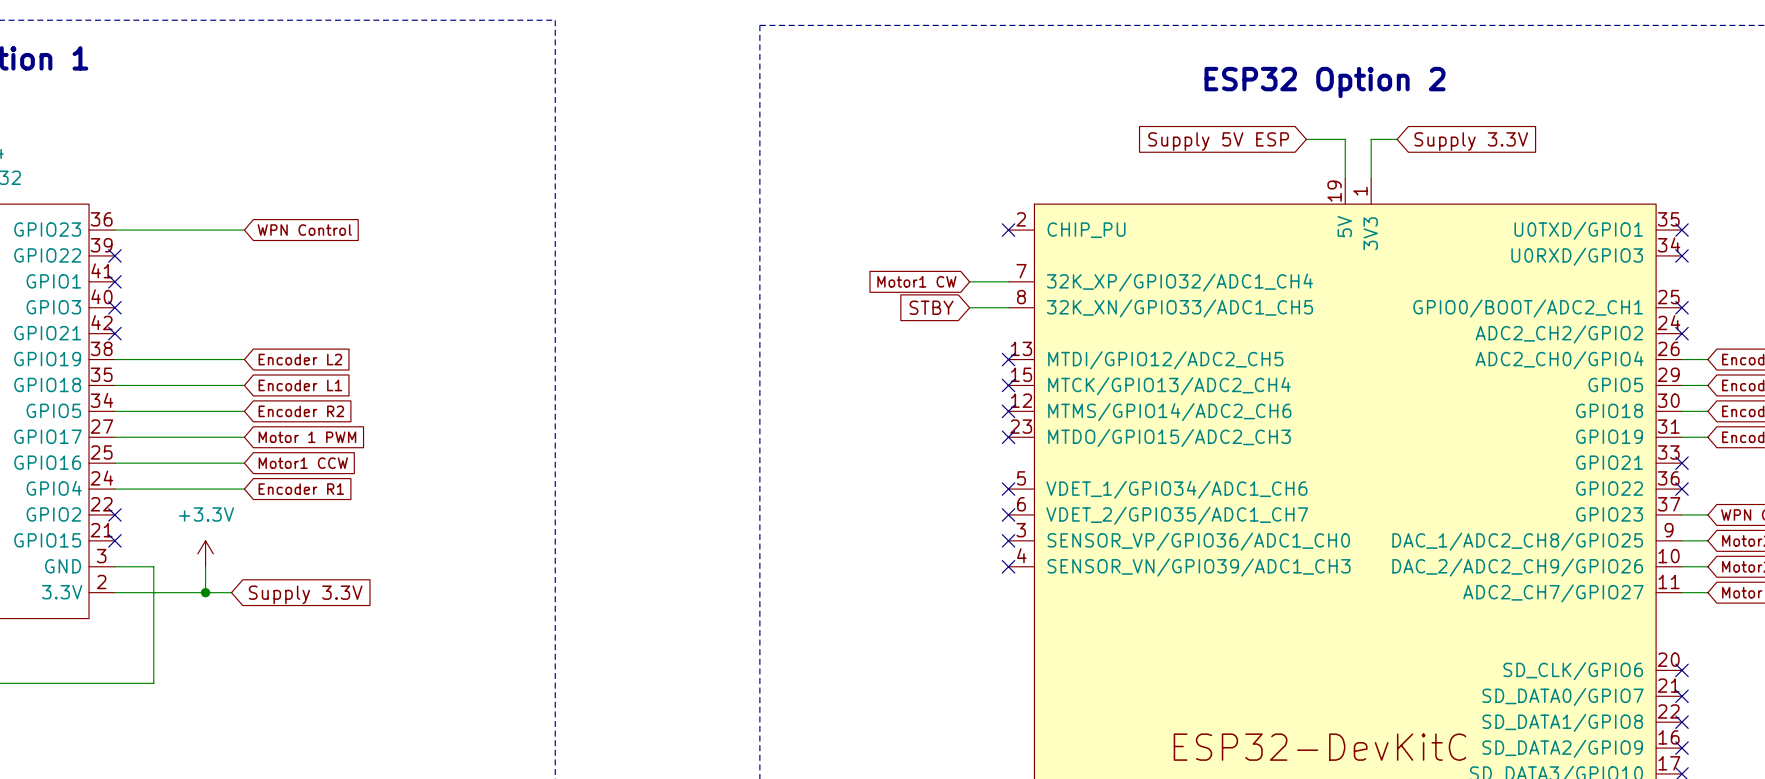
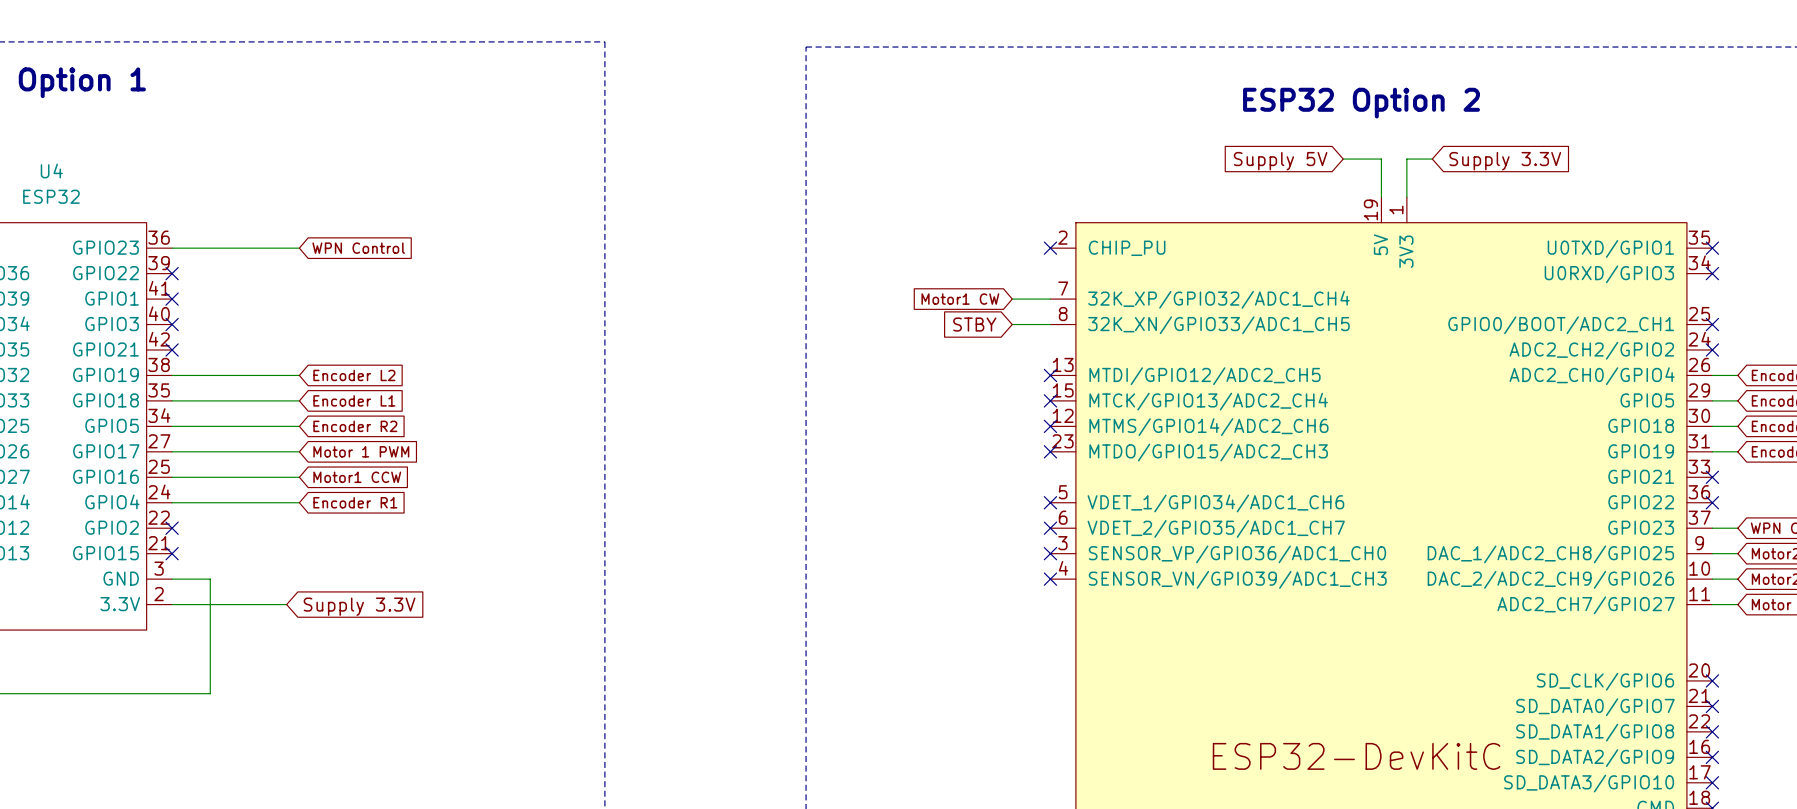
global label: Supply 5V ESP (1218, 141) -> Supply 5V (1280, 161)
power symbol: +3.3V (205, 553) -> none
wire: (205, 566) (205, 592) -> none
junction: (205, 592) -> none

